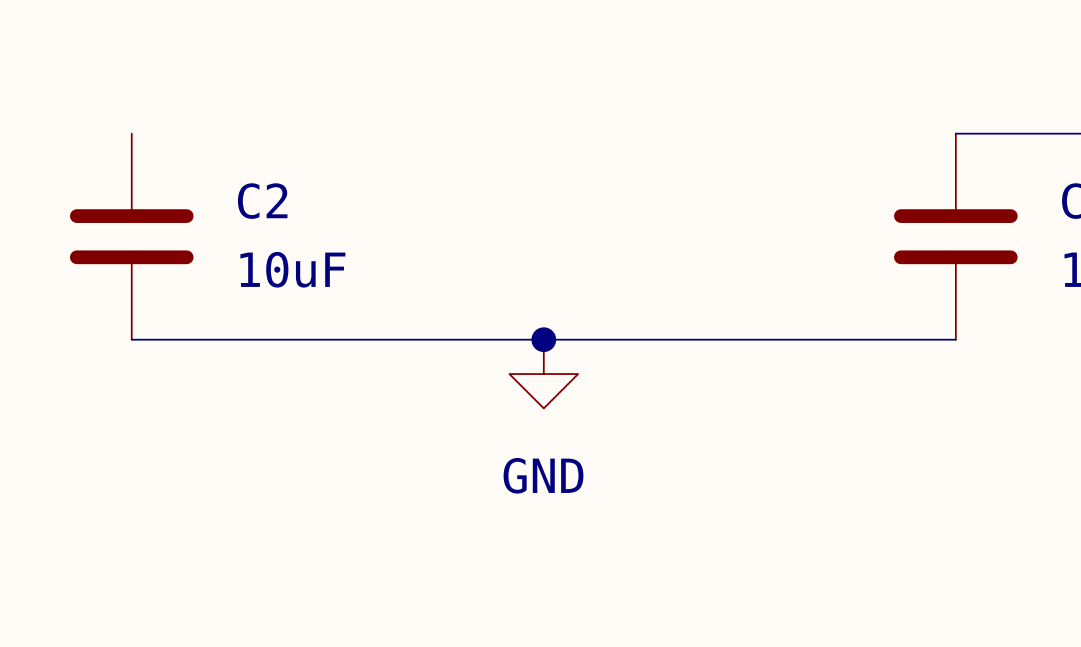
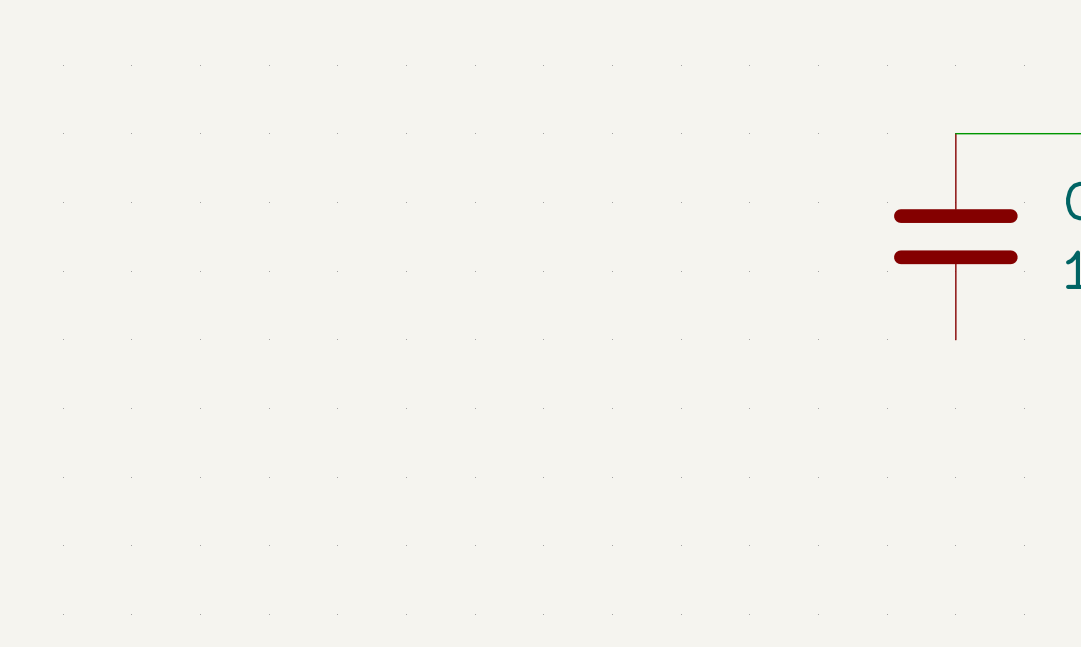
C2: 10uF (131, 236) -> none
wire: (131, 339) (955, 339) -> none
junction: (543, 339) -> none
power symbol: GND (543, 374) -> none

